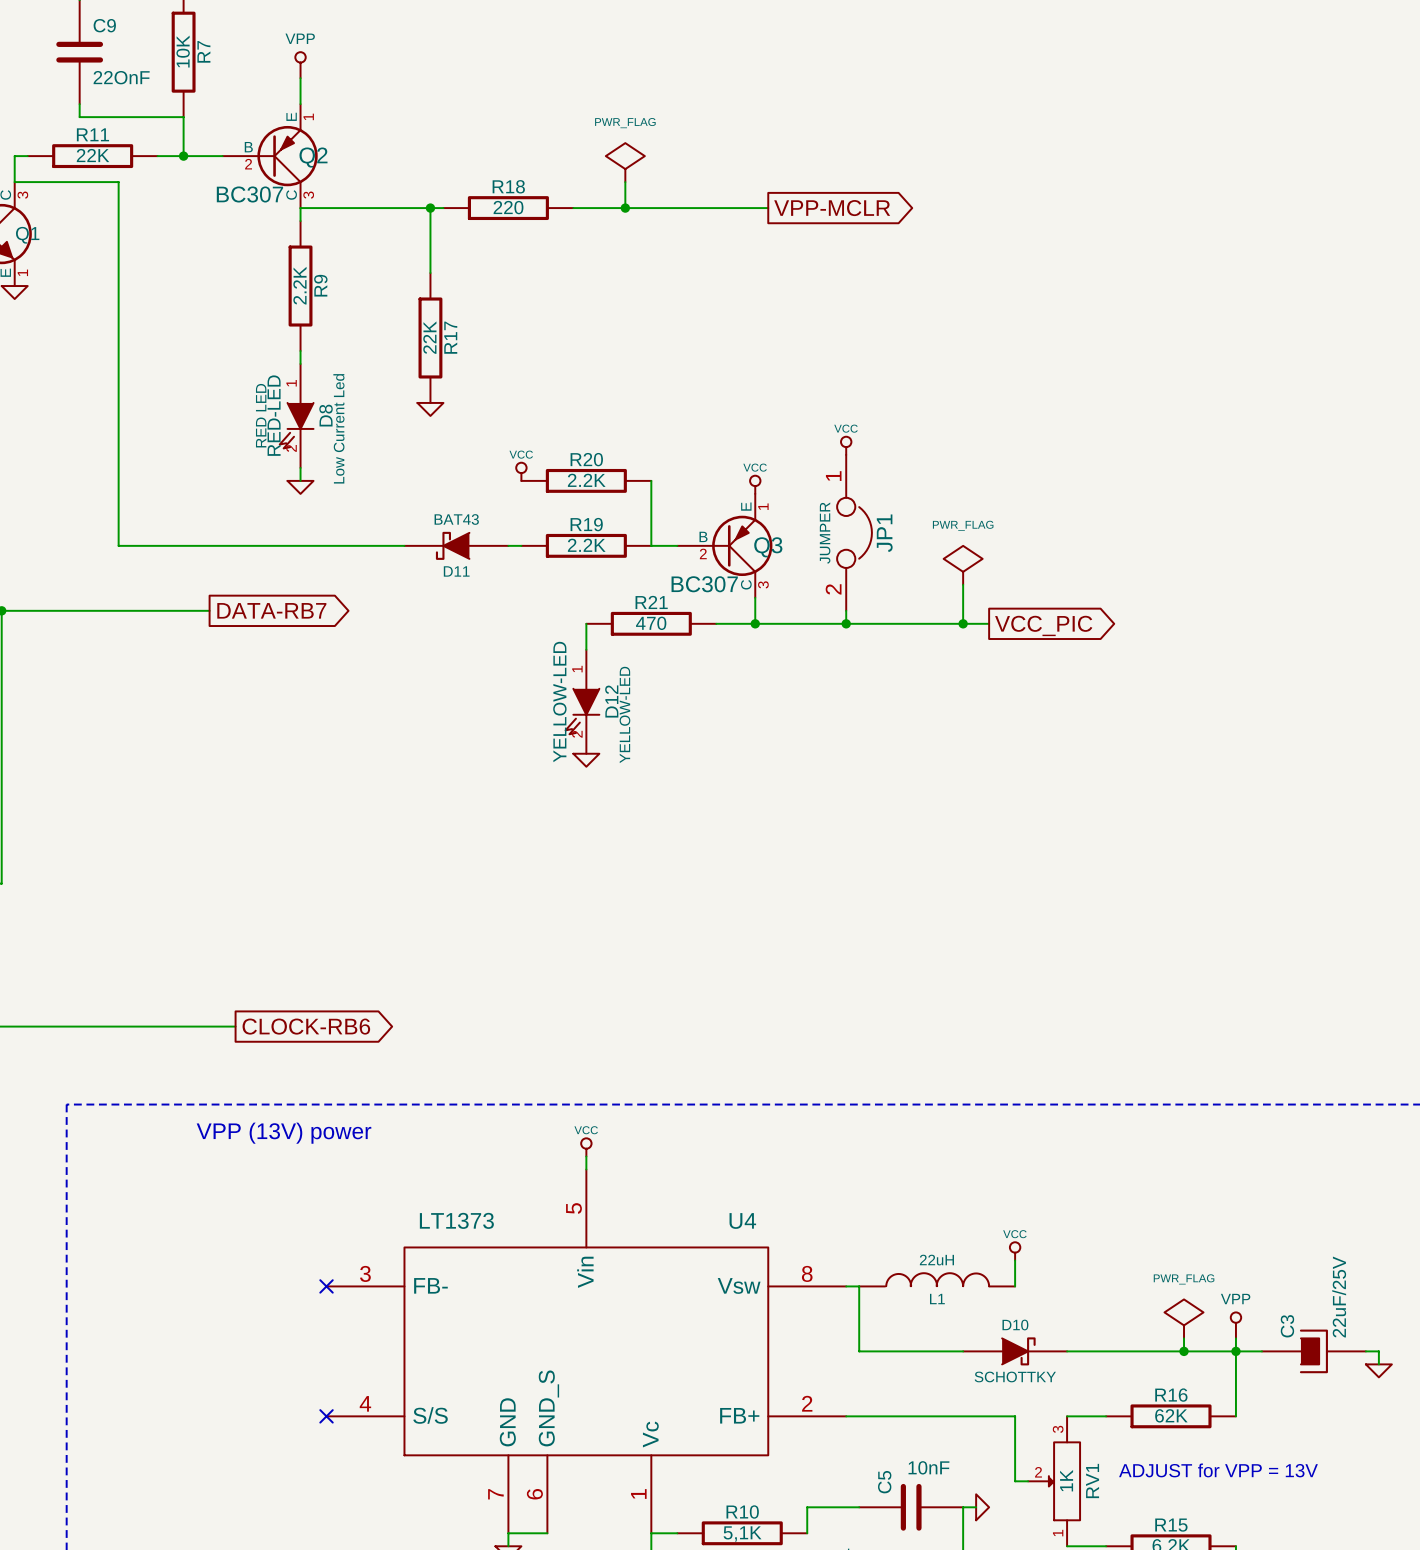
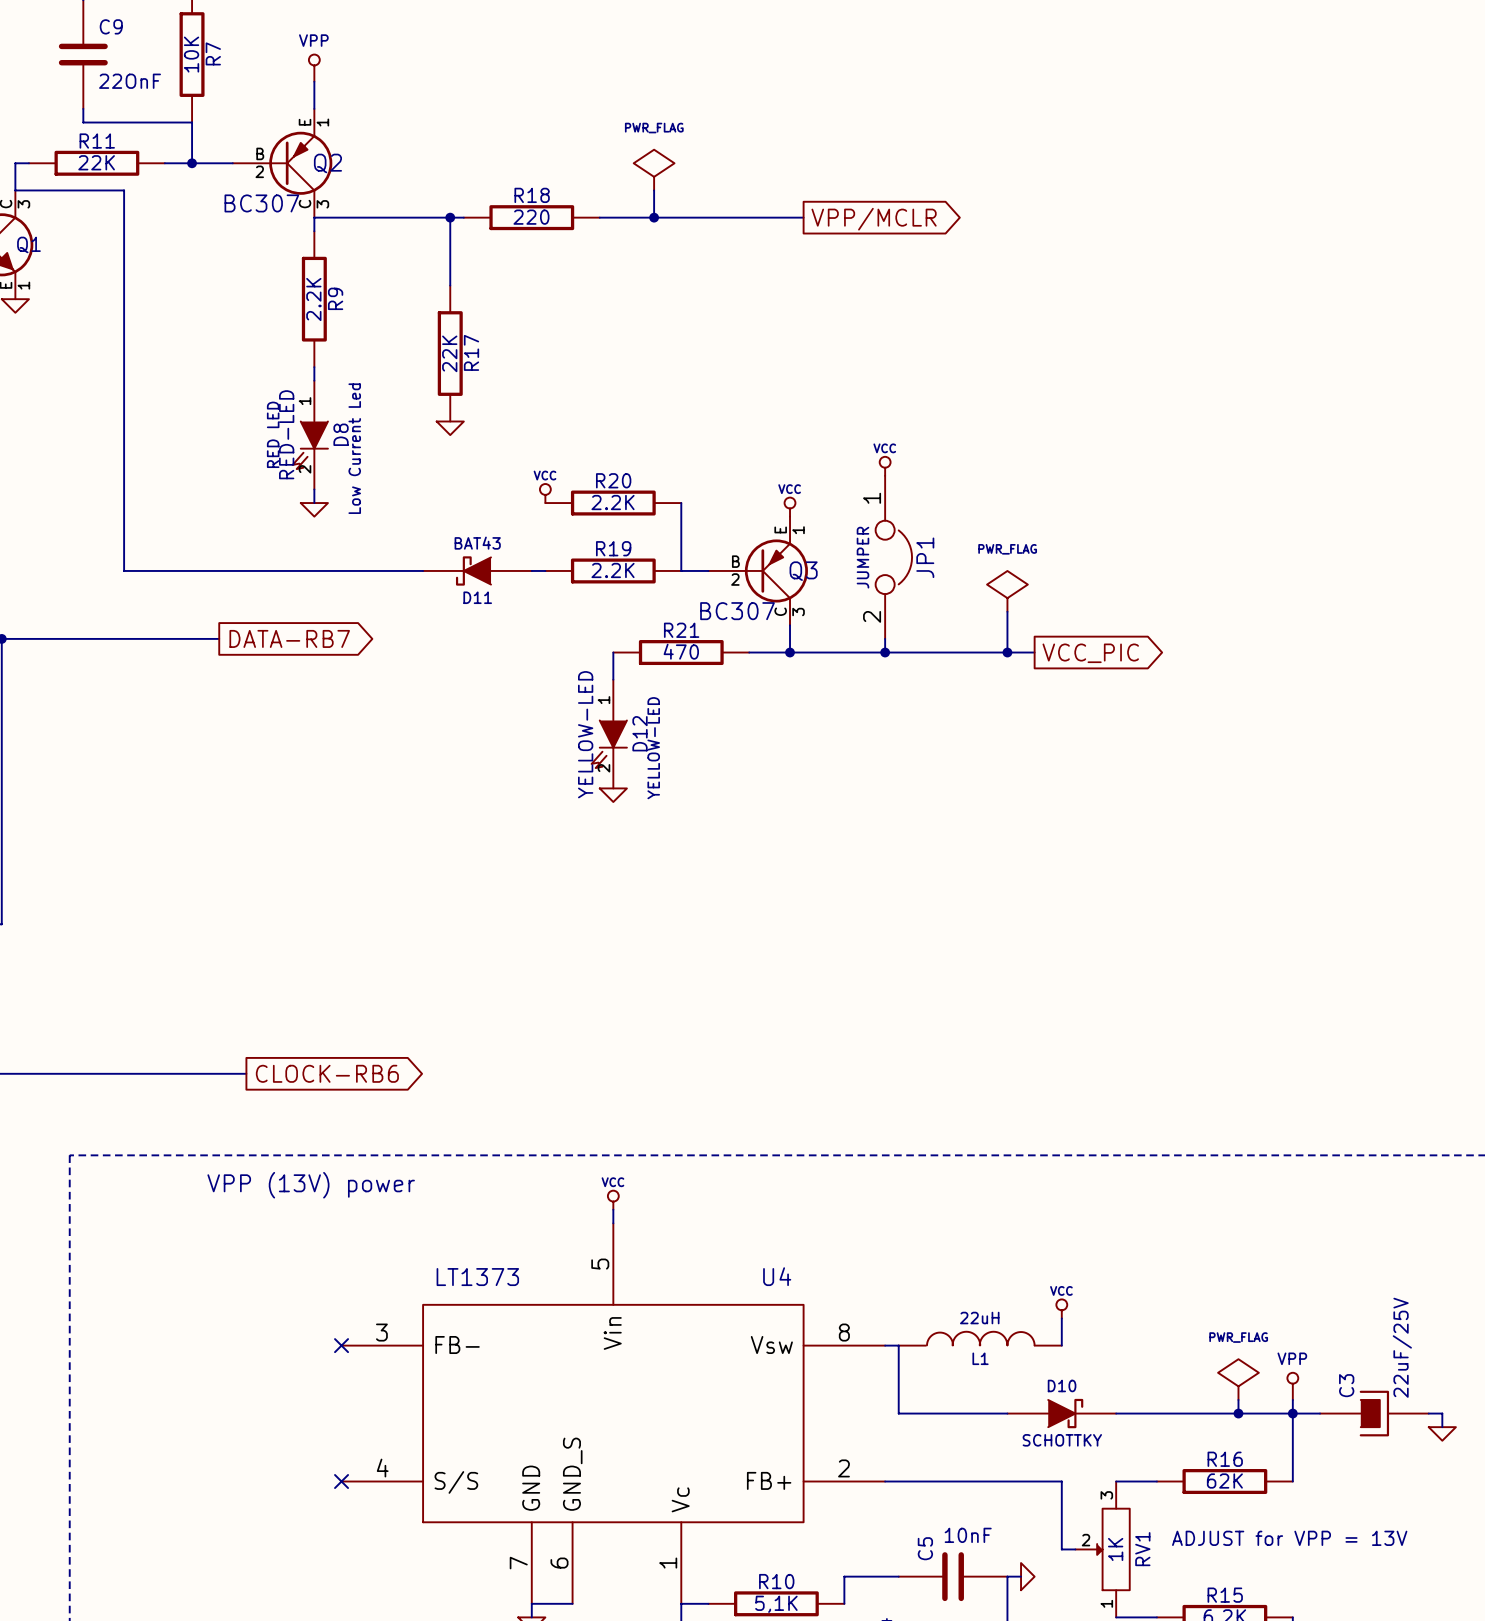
global label: VPP-MCLR (832, 208) -> VPP/MCLR (874, 219)

